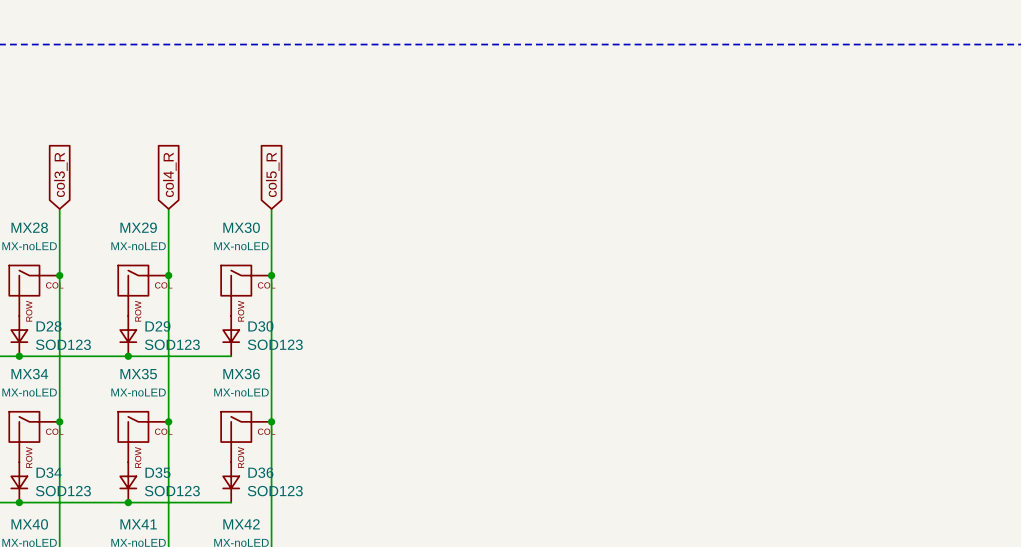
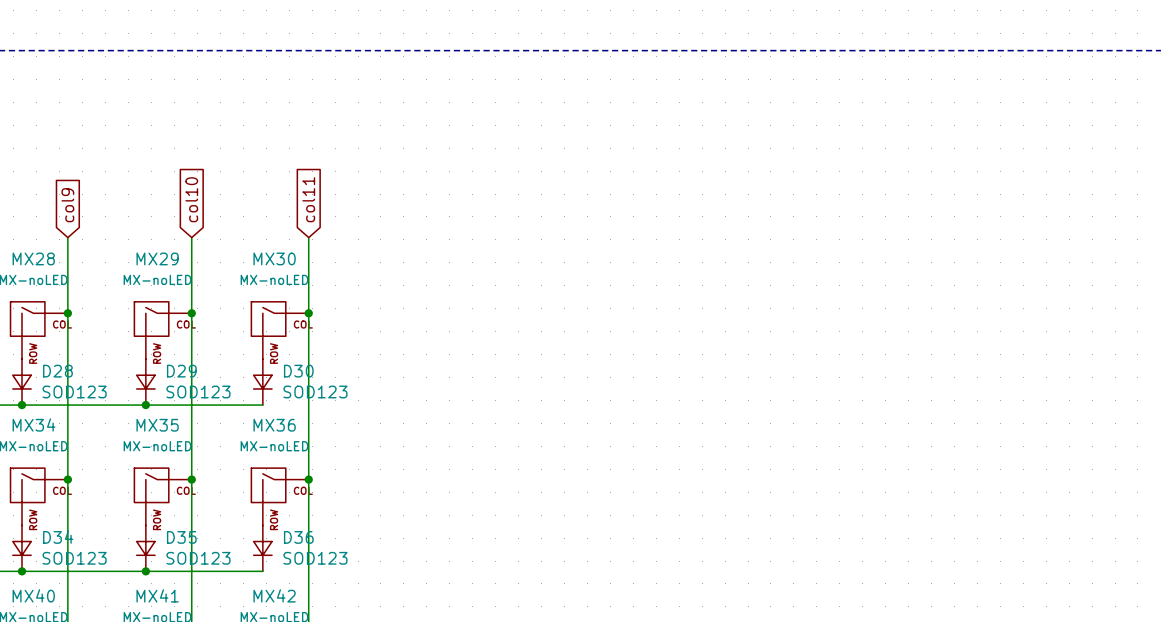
global label: col3_R (60, 174) -> col9 (67, 205)
global label: col4_R (169, 174) -> col10 (191, 199)
global label: col5_R (272, 174) -> col11 (308, 199)

